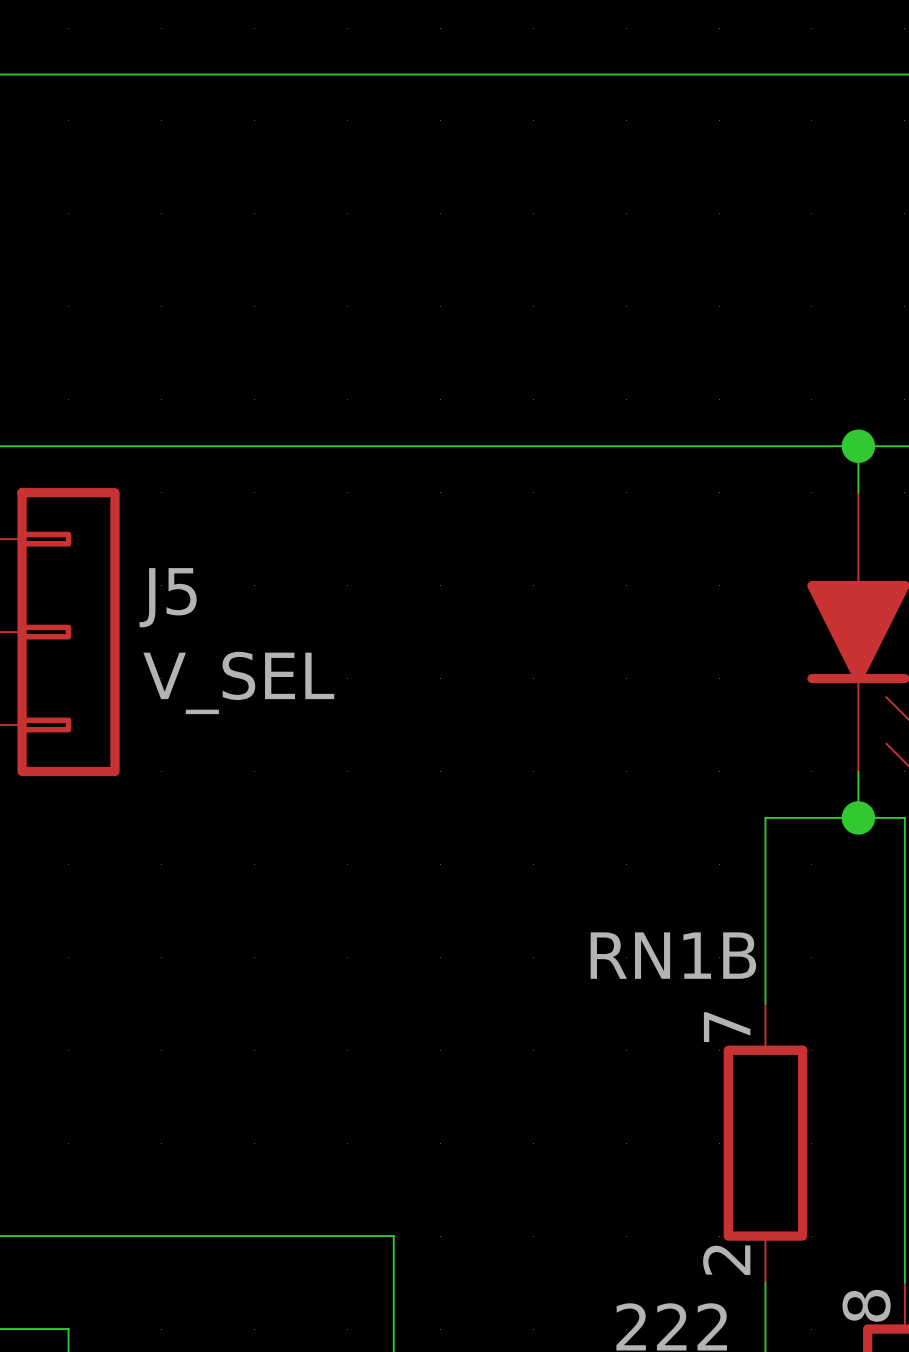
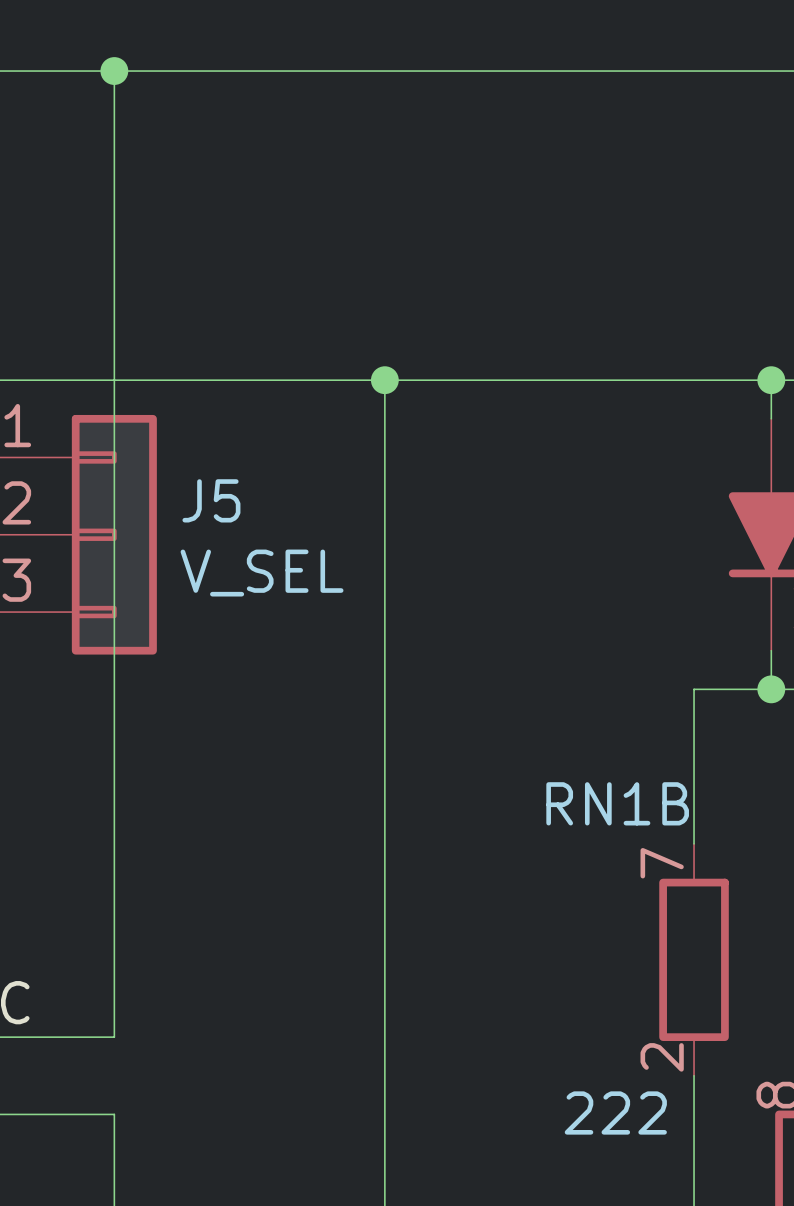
wire: none -> (114, 71) (114, 1037)
junction: none -> (114, 71)
junction: none -> (384, 380)
wire: (68, 1236) (393, 1236) -> (384, 380) (384, 1037)

